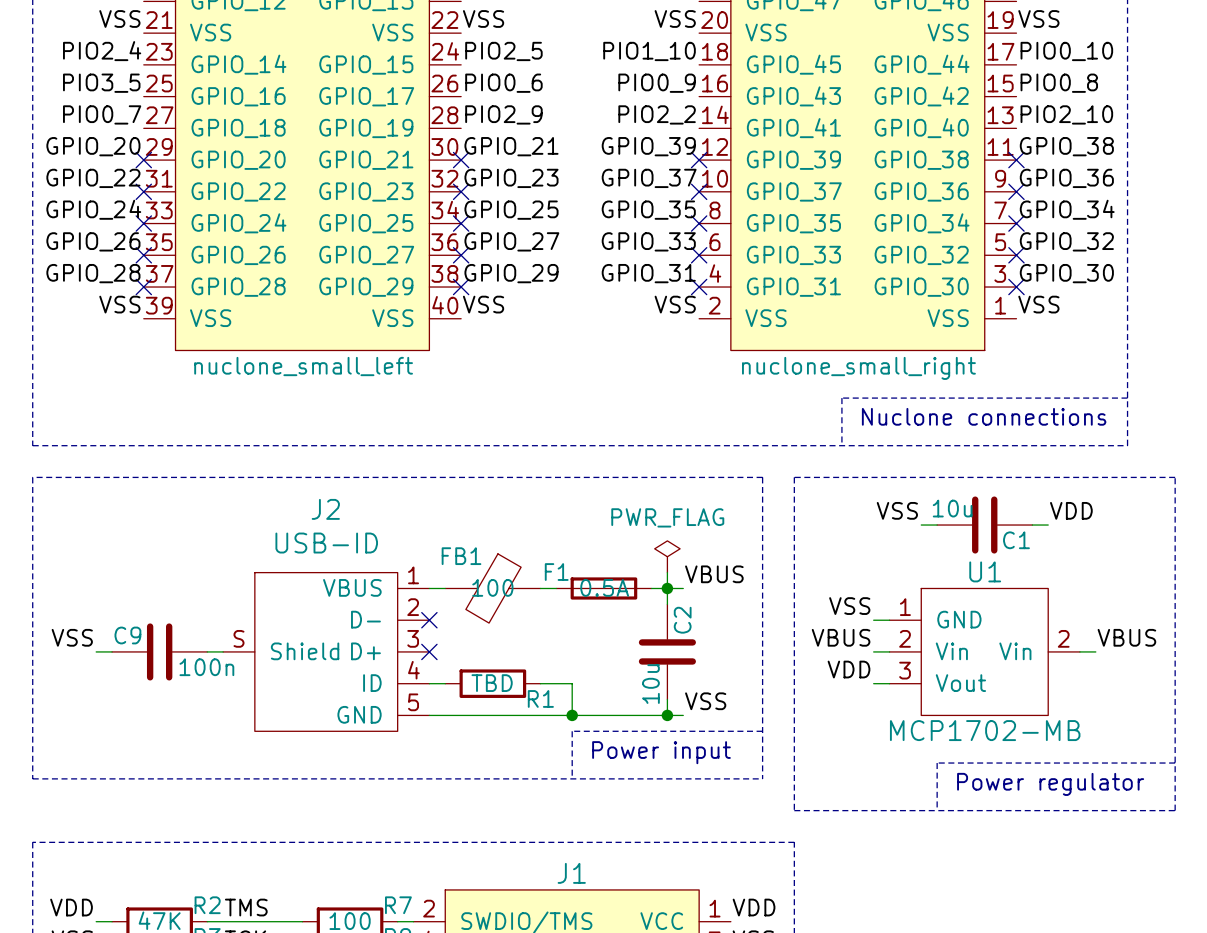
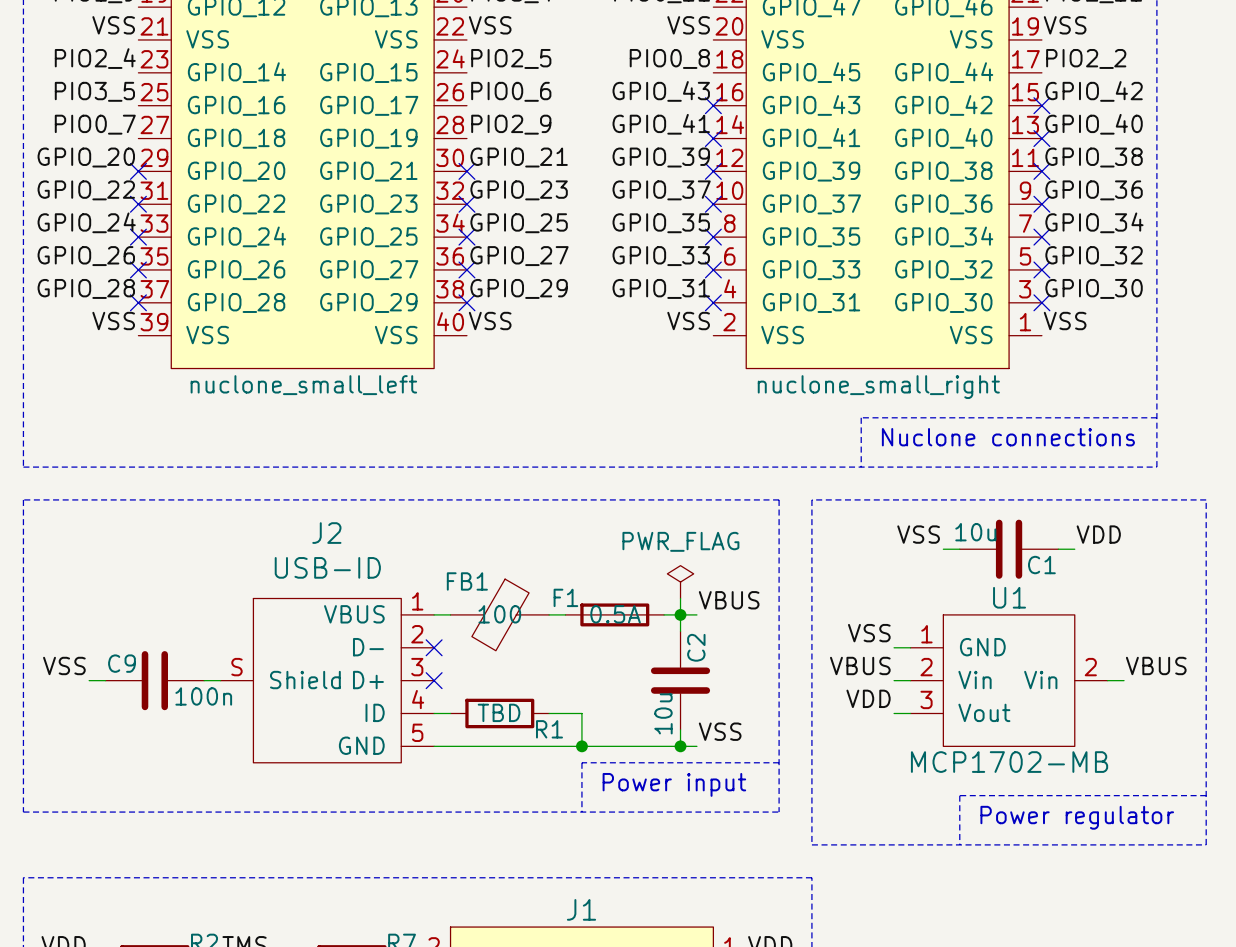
label: PIO1_10 (649, 51) -> PIO0_8 (669, 58)
label: PIO0_10 (1066, 51) -> PIO2_2 (1086, 58)
label: PIO0_9 (657, 83) -> GPIO_43 (661, 91)
label: PIO0_8 (1059, 83) -> GPIO_42 (1094, 91)
no-connect mark: none -> (713, 105)
no-connect mark: none -> (1041, 105)
label: PIO2_2 (657, 114) -> GPIO_41 (661, 124)
label: PIO2_10 (1066, 114) -> GPIO_40 (1094, 124)
no-connect mark: none -> (713, 138)
no-connect mark: none -> (1041, 138)

